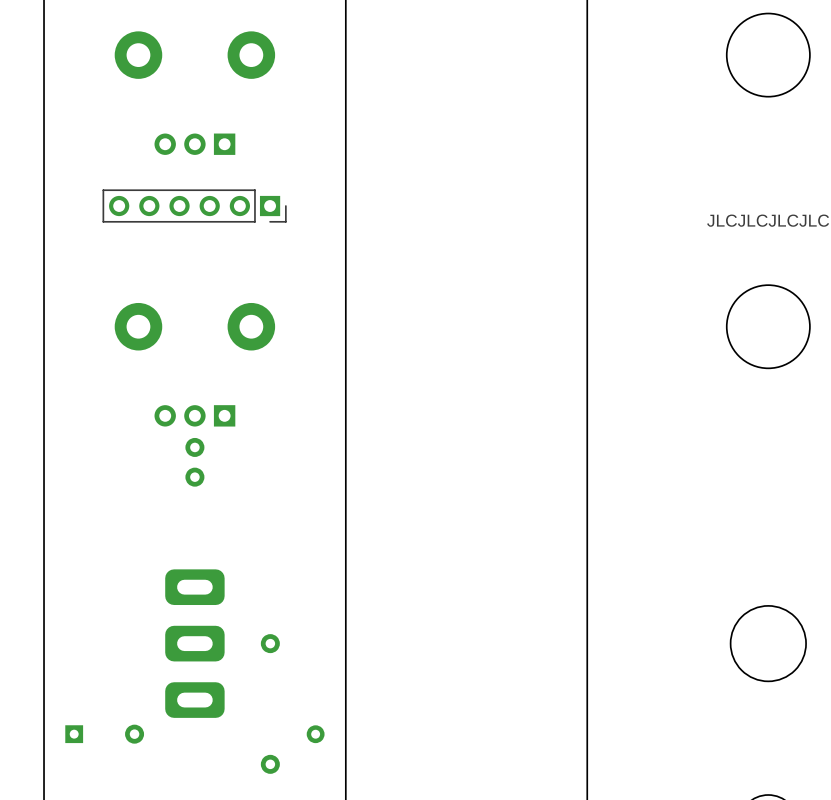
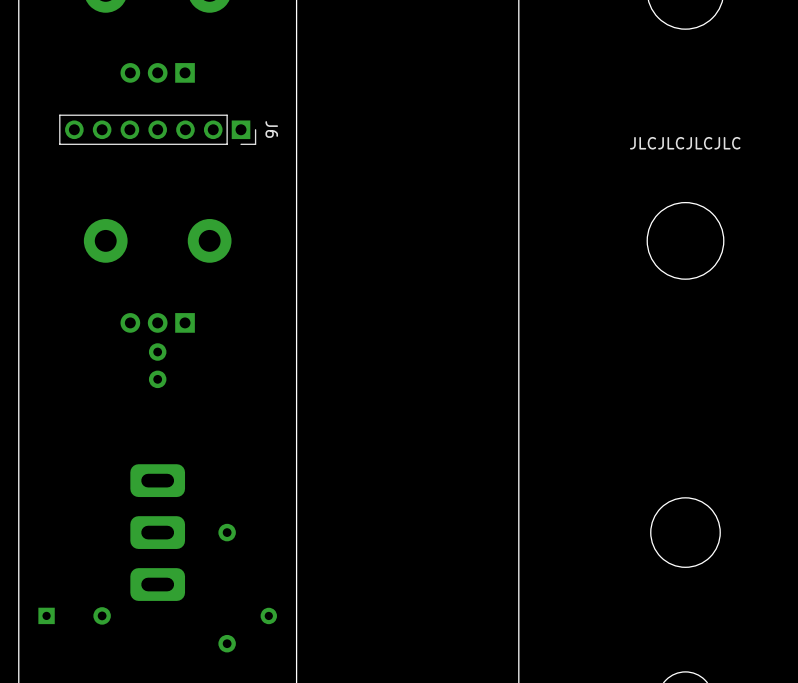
part: (194, 206) -> none
J6: none -> (157, 129)

